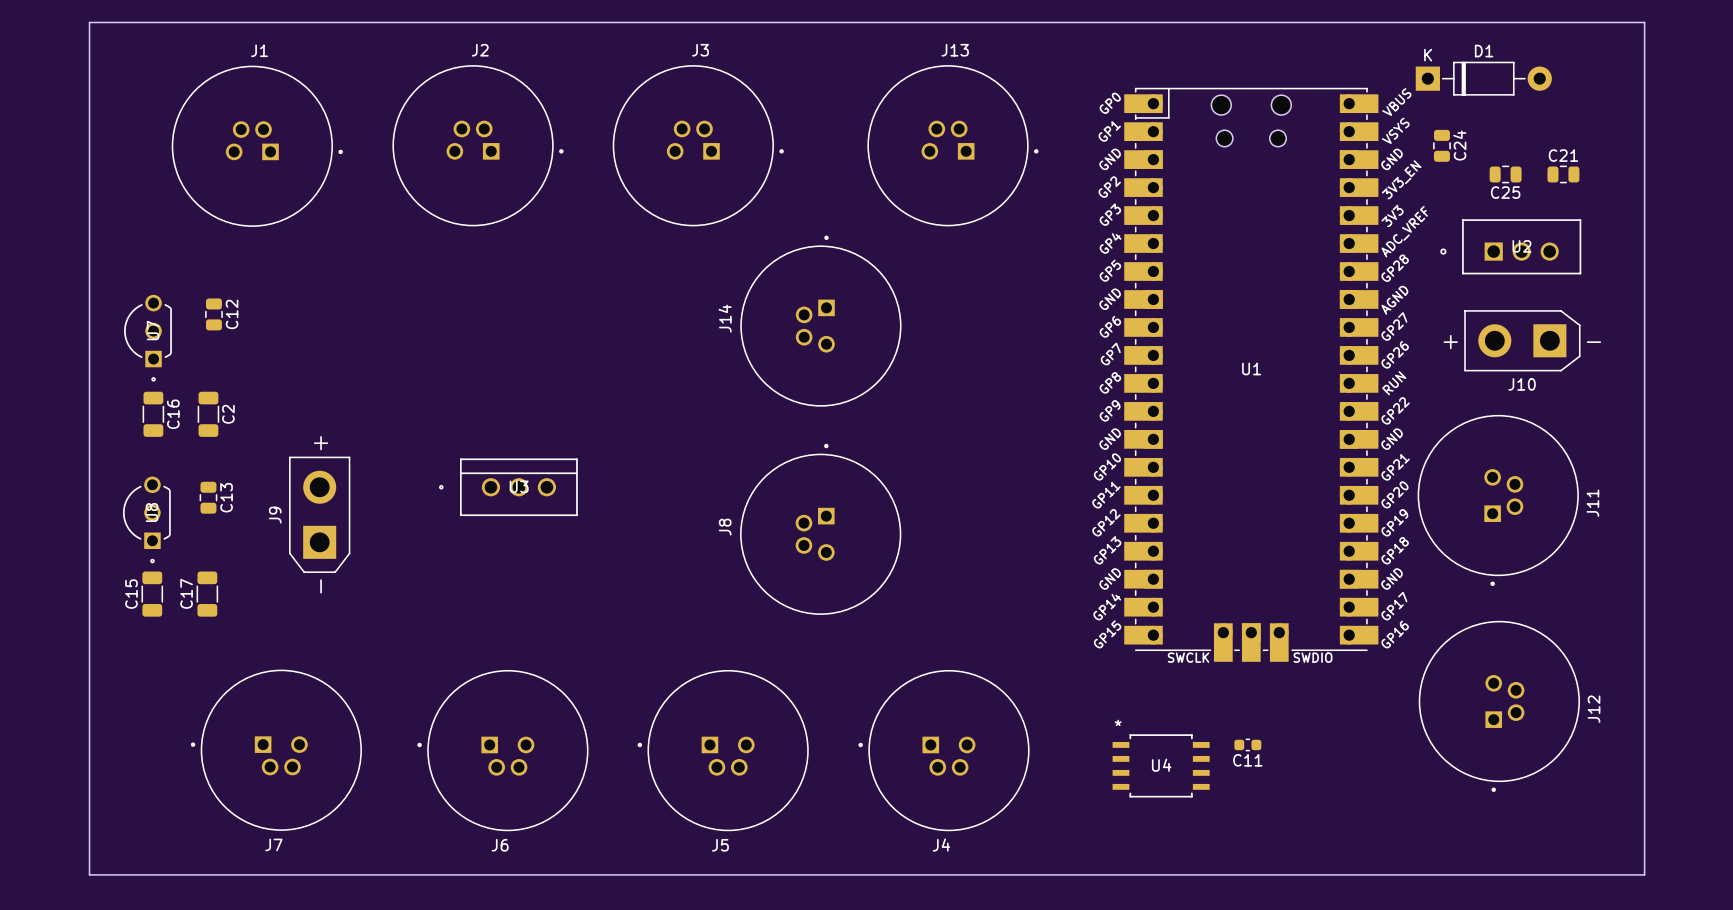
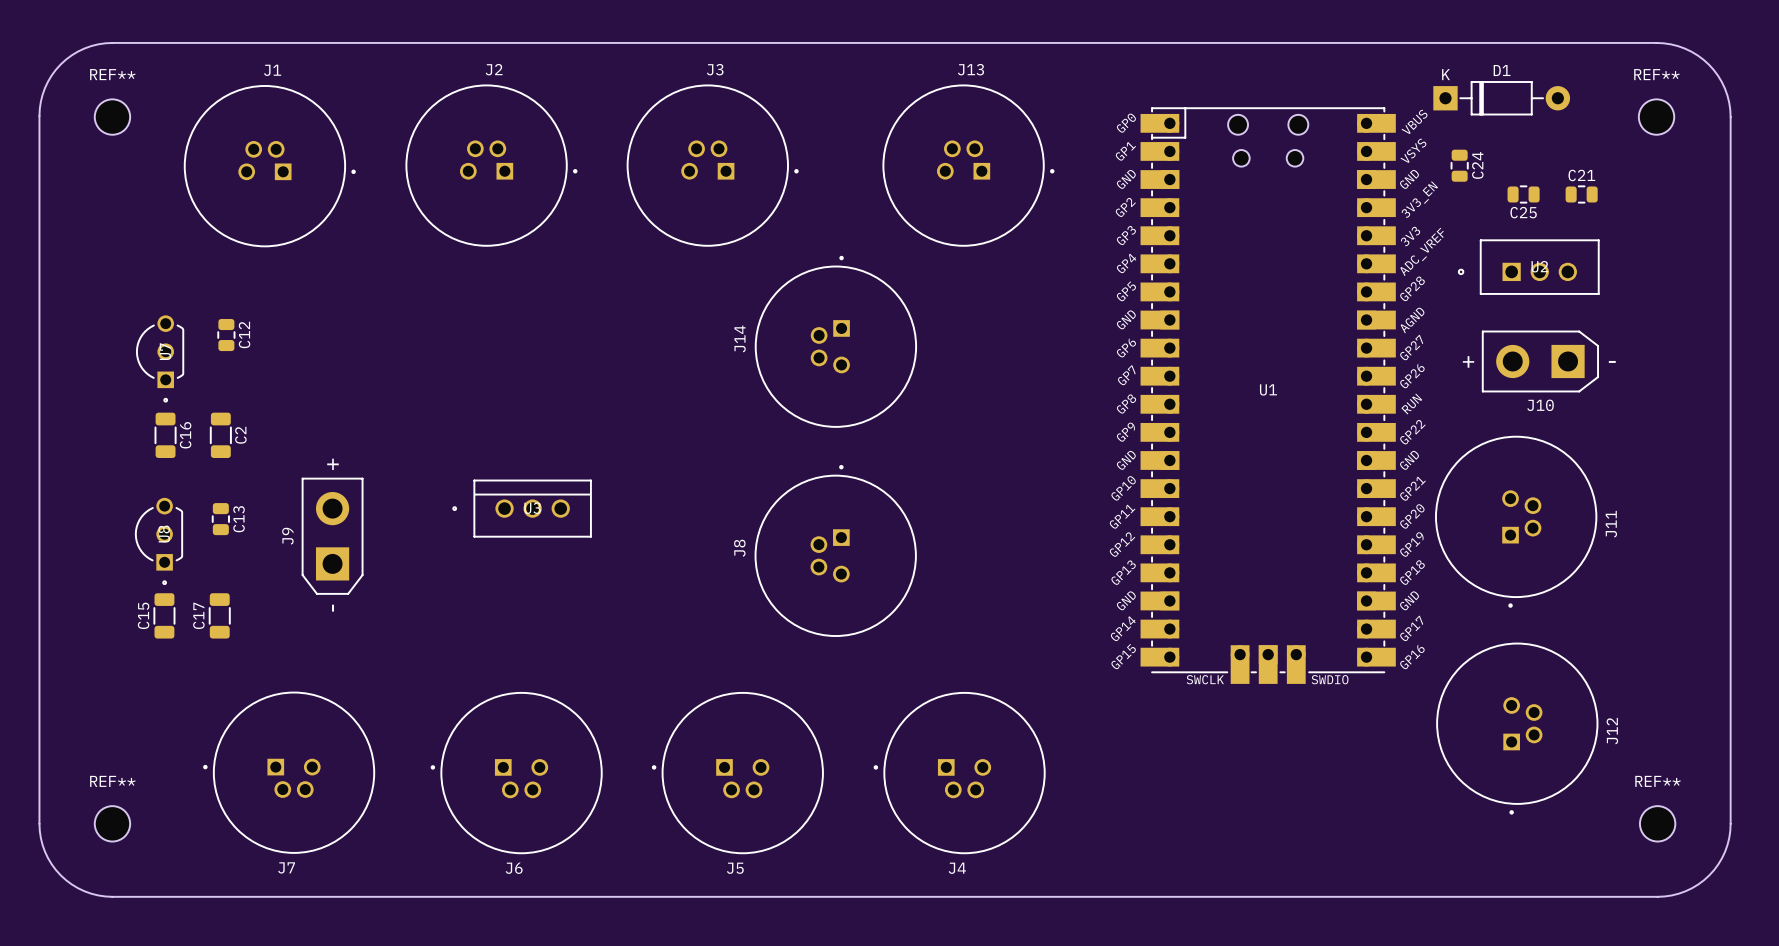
board edge: (89, 22) (1644, 22) (1644, 874) (89, 874) (89, 22) -> (112, 42) (84, 48) (60, 64) (45, 88) (39, 115) (39, 830) (42, 845) (51, 864) (66, 880) (78, 888) (98, 895) (112, 896) (1657, 896) (1678, 893) (1698, 884) (1714, 870) (1722, 858) (1729, 838) (1730, 823) (1730, 117) (1729, 102) (1721, 82) (1708, 64) (1691, 51) (1670, 44) (1656, 42) (112, 42)
REF**: none -> (112, 117)
REF**: none -> (1656, 117)
C11: (1247, 744) -> none
U4: (1161, 765) -> none
REF**: none -> (112, 823)
REF**: none -> (1657, 823)

